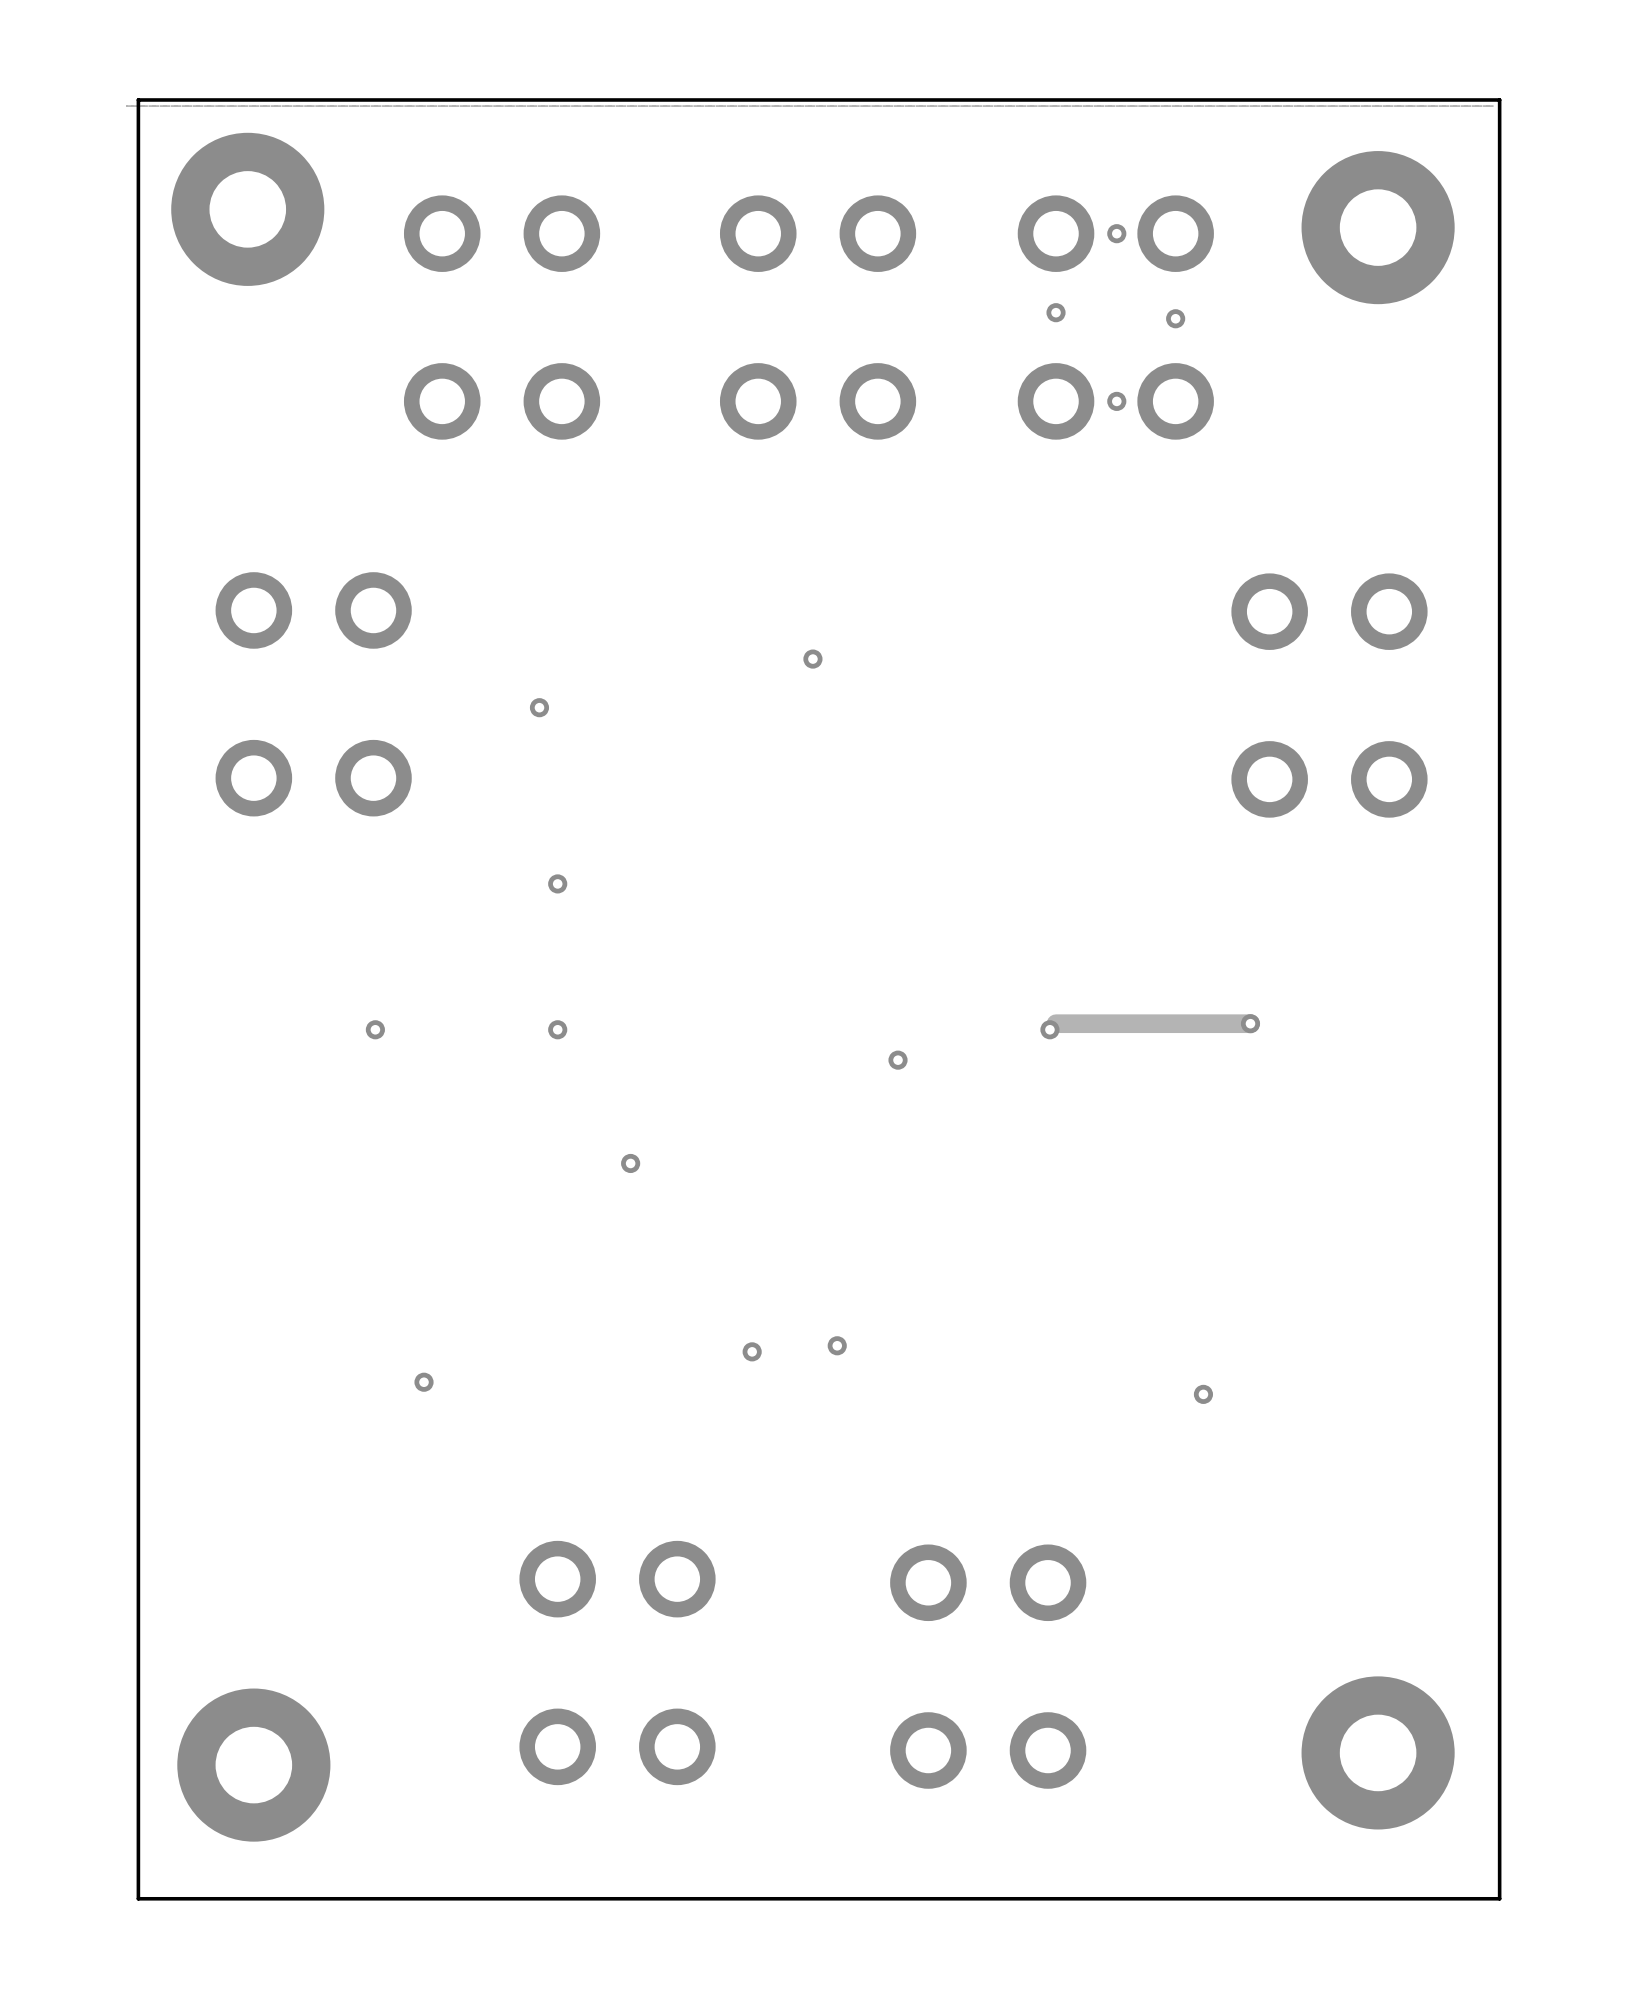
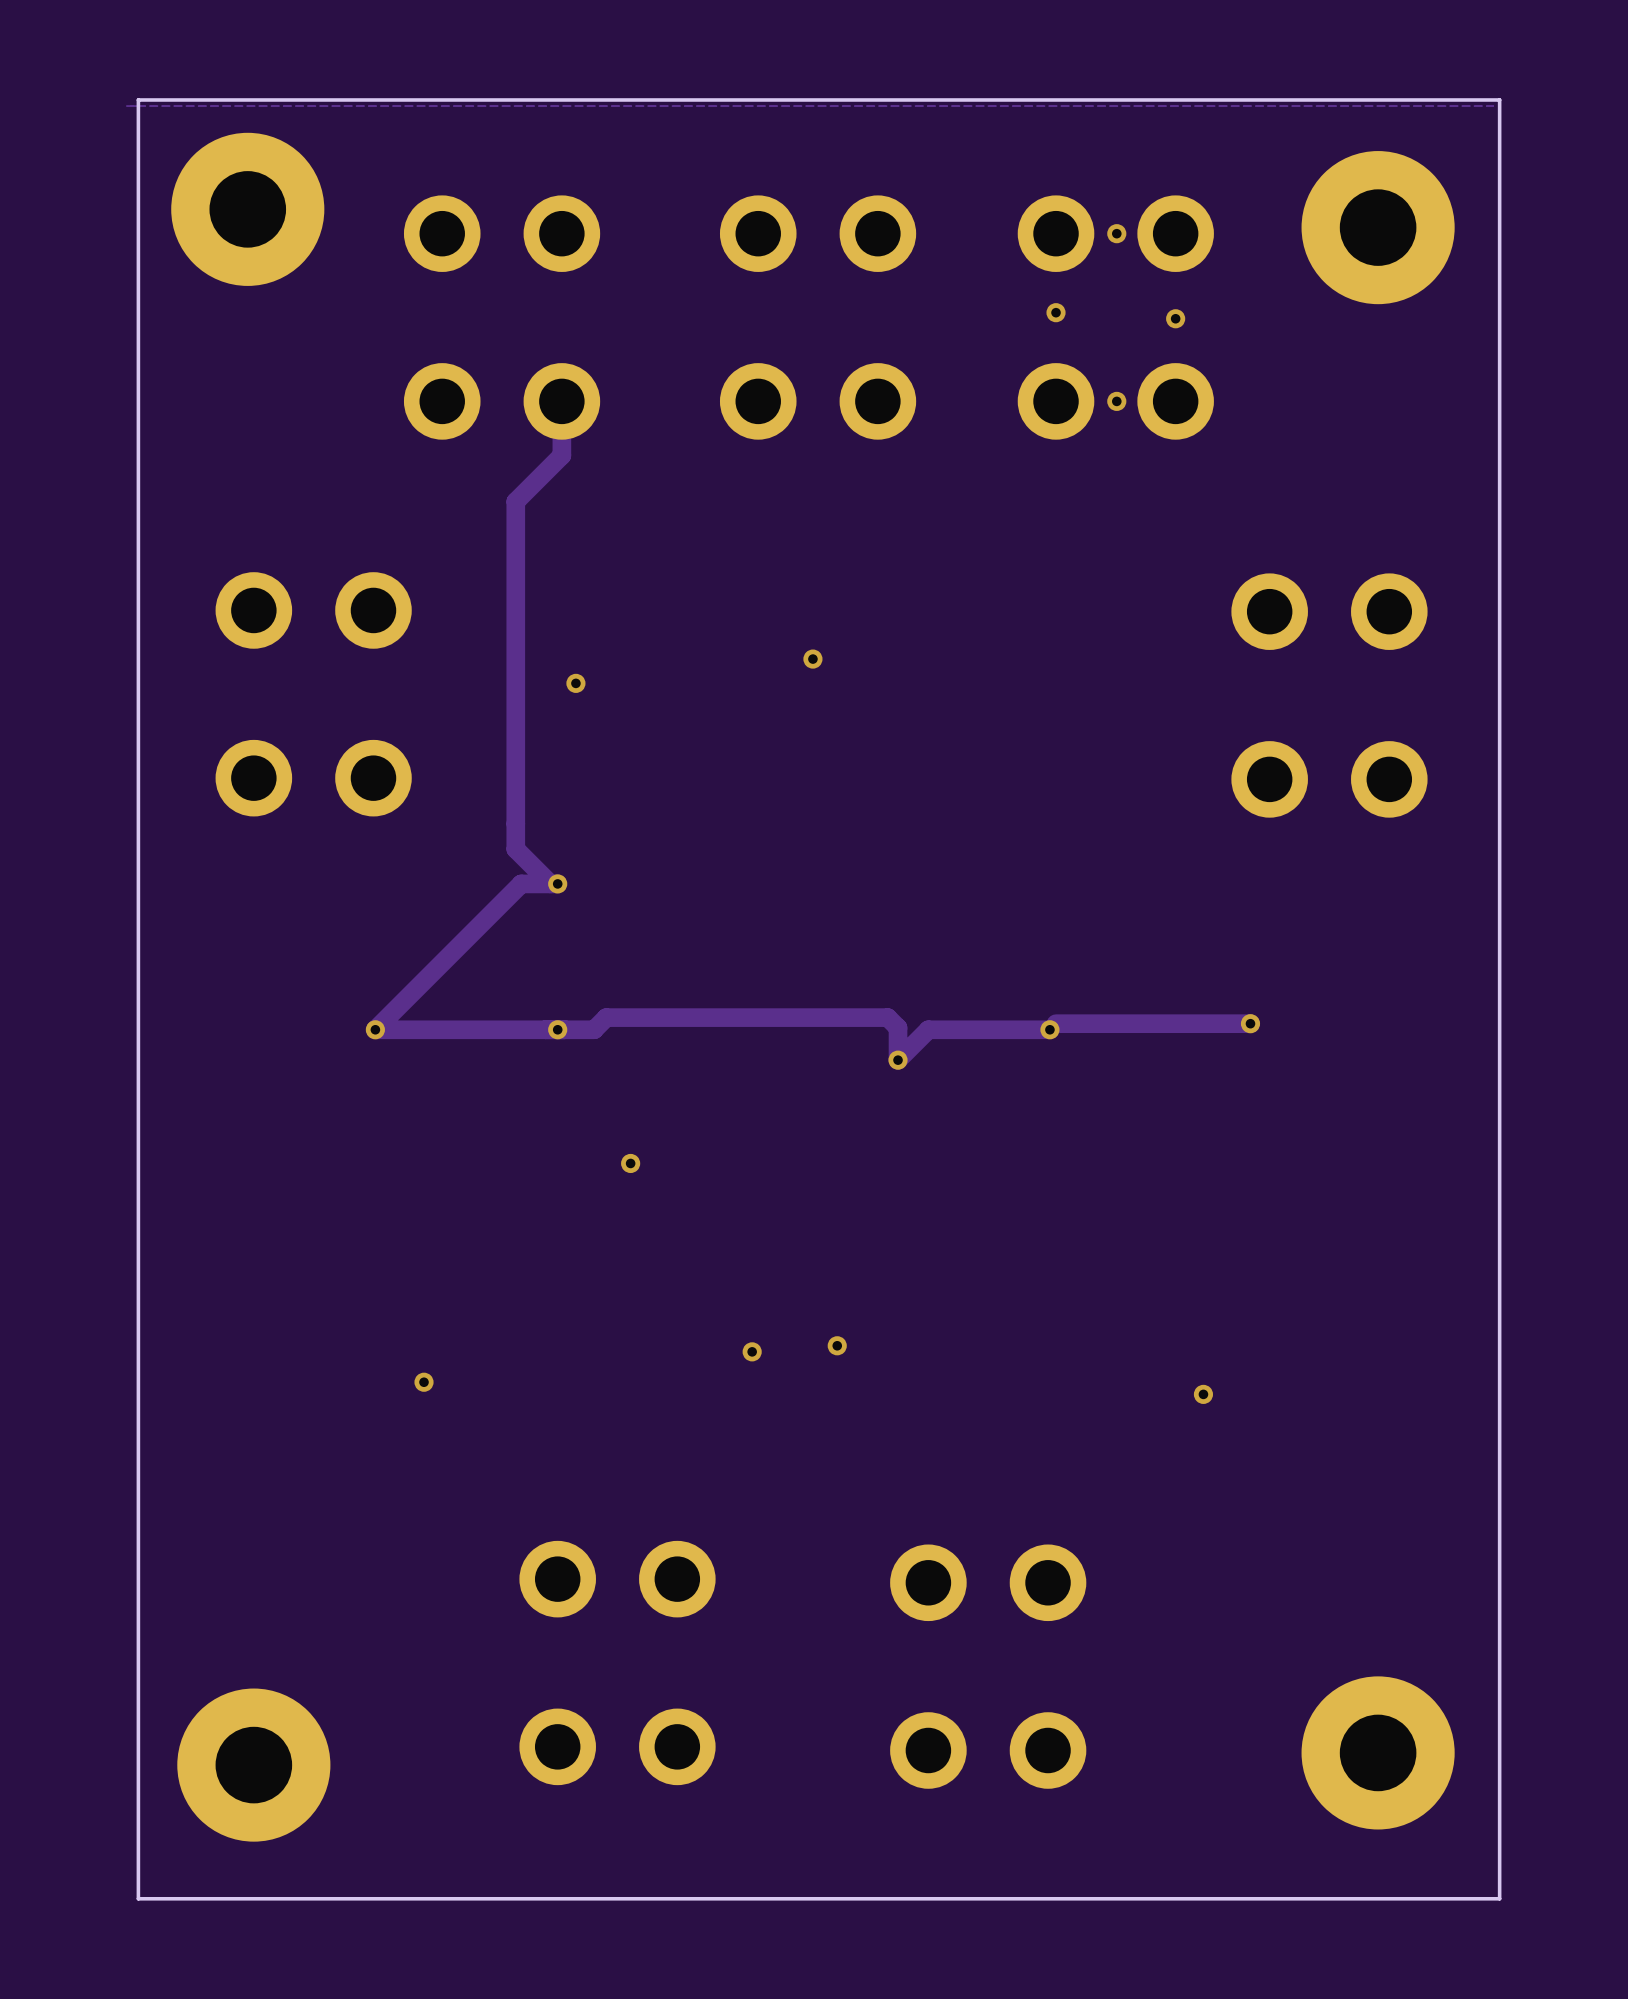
track: none -> (561, 401) (561, 455) (515, 501) (515, 849) (550, 883)
via position: (539, 707) -> (575, 683)
track: none -> (557, 883) (521, 883) (375, 1029) (594, 1029) (606, 1017) (887, 1017) (898, 1027) (898, 1060) (928, 1029) (1049, 1029)

